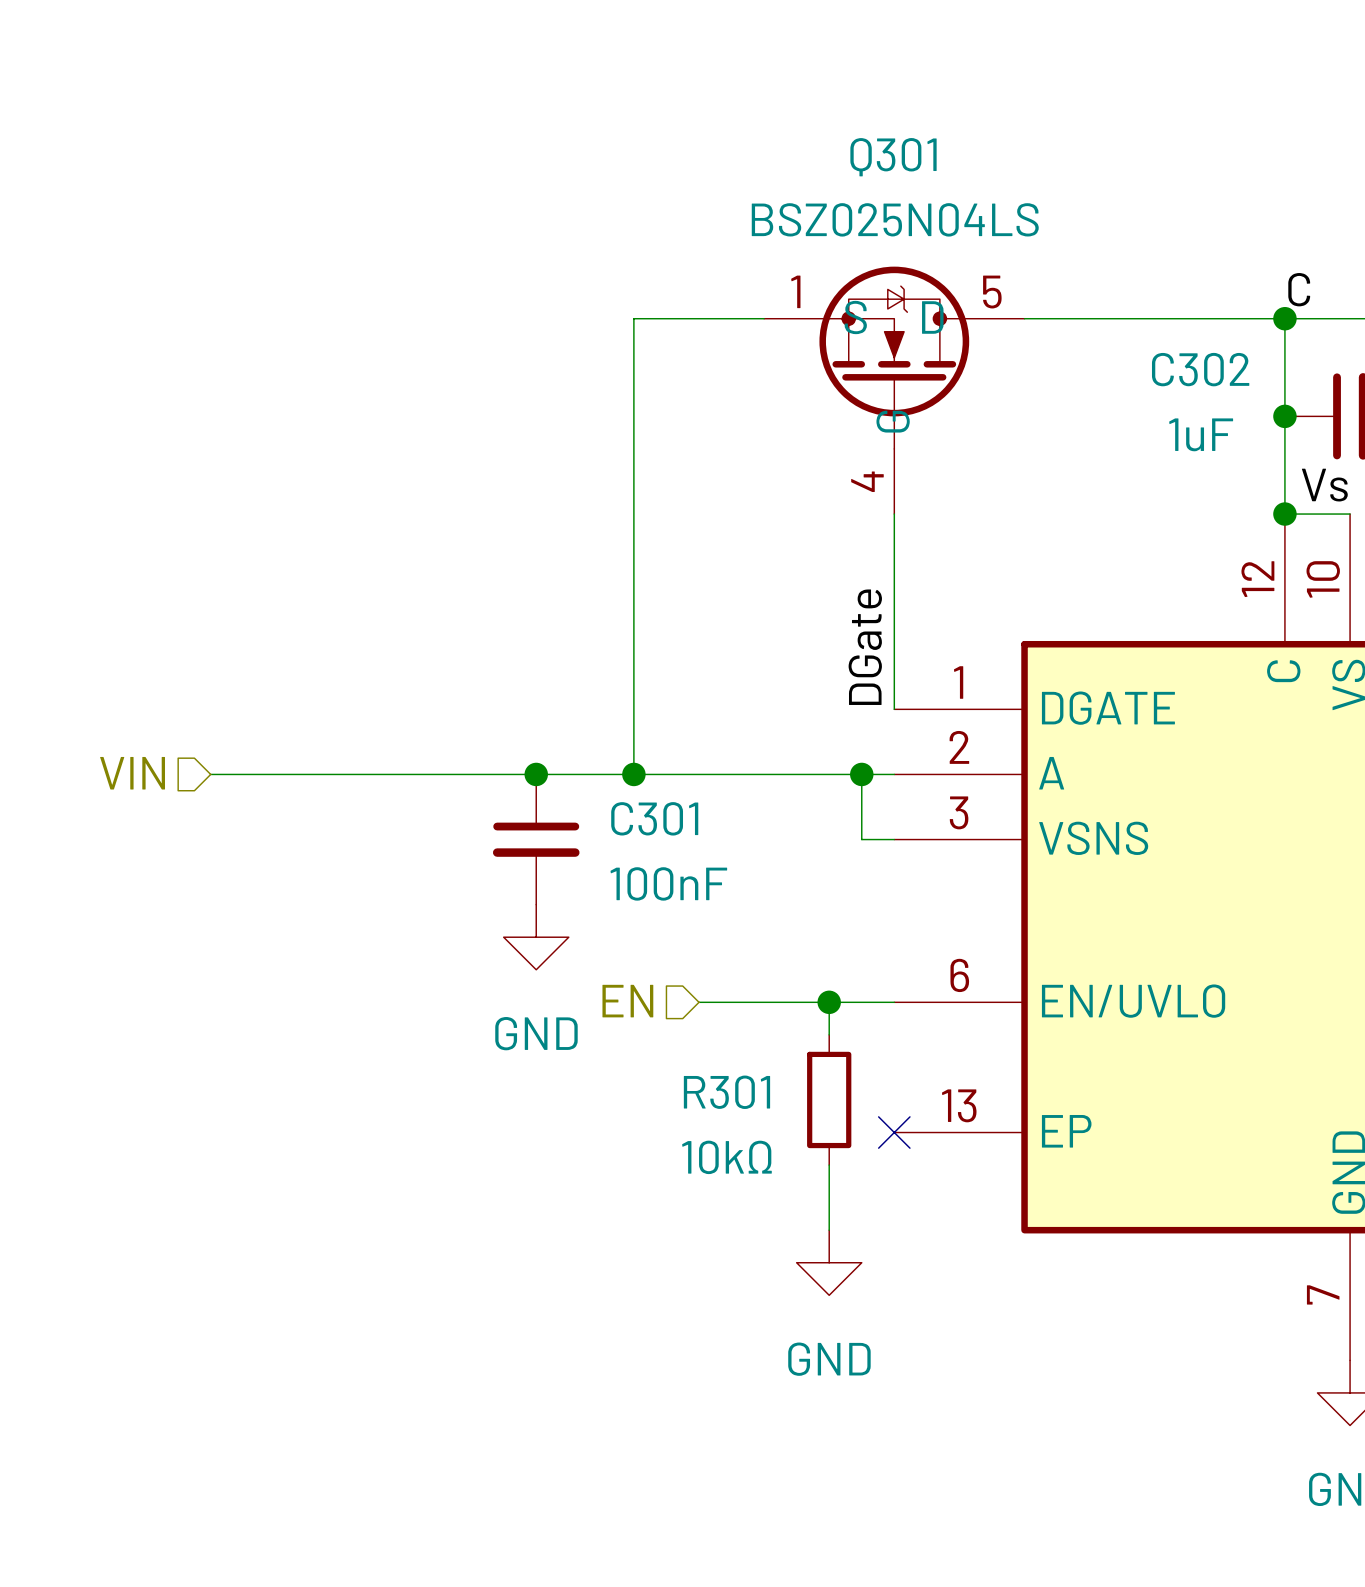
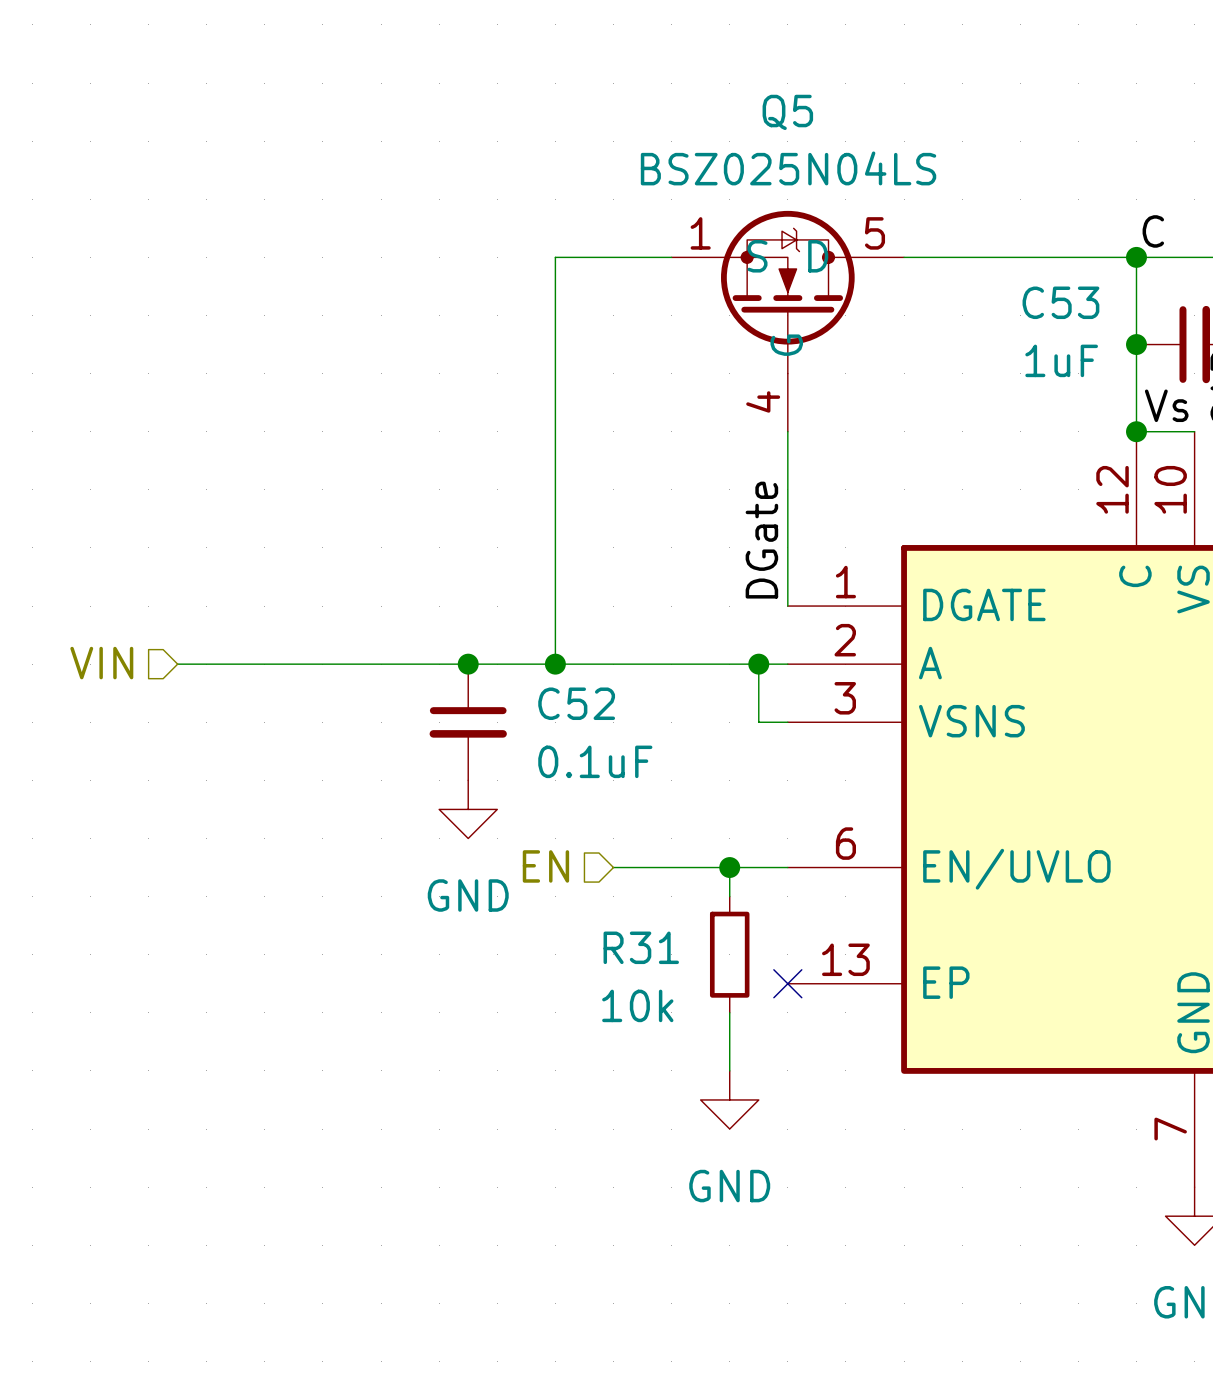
Q301 name: Q301 (893, 157) -> Q5 (787, 112)
C302 name: C302 (1200, 369) -> C53 (1060, 302)
C301 name: C301 (654, 818) -> C52 (576, 703)
C301 value: 100nF (668, 883) -> 0.1uF (595, 761)
R301 name: R301 (726, 1092) -> R31 (641, 947)
R301 value: 10kΩ (726, 1157) -> 10k (637, 1005)

